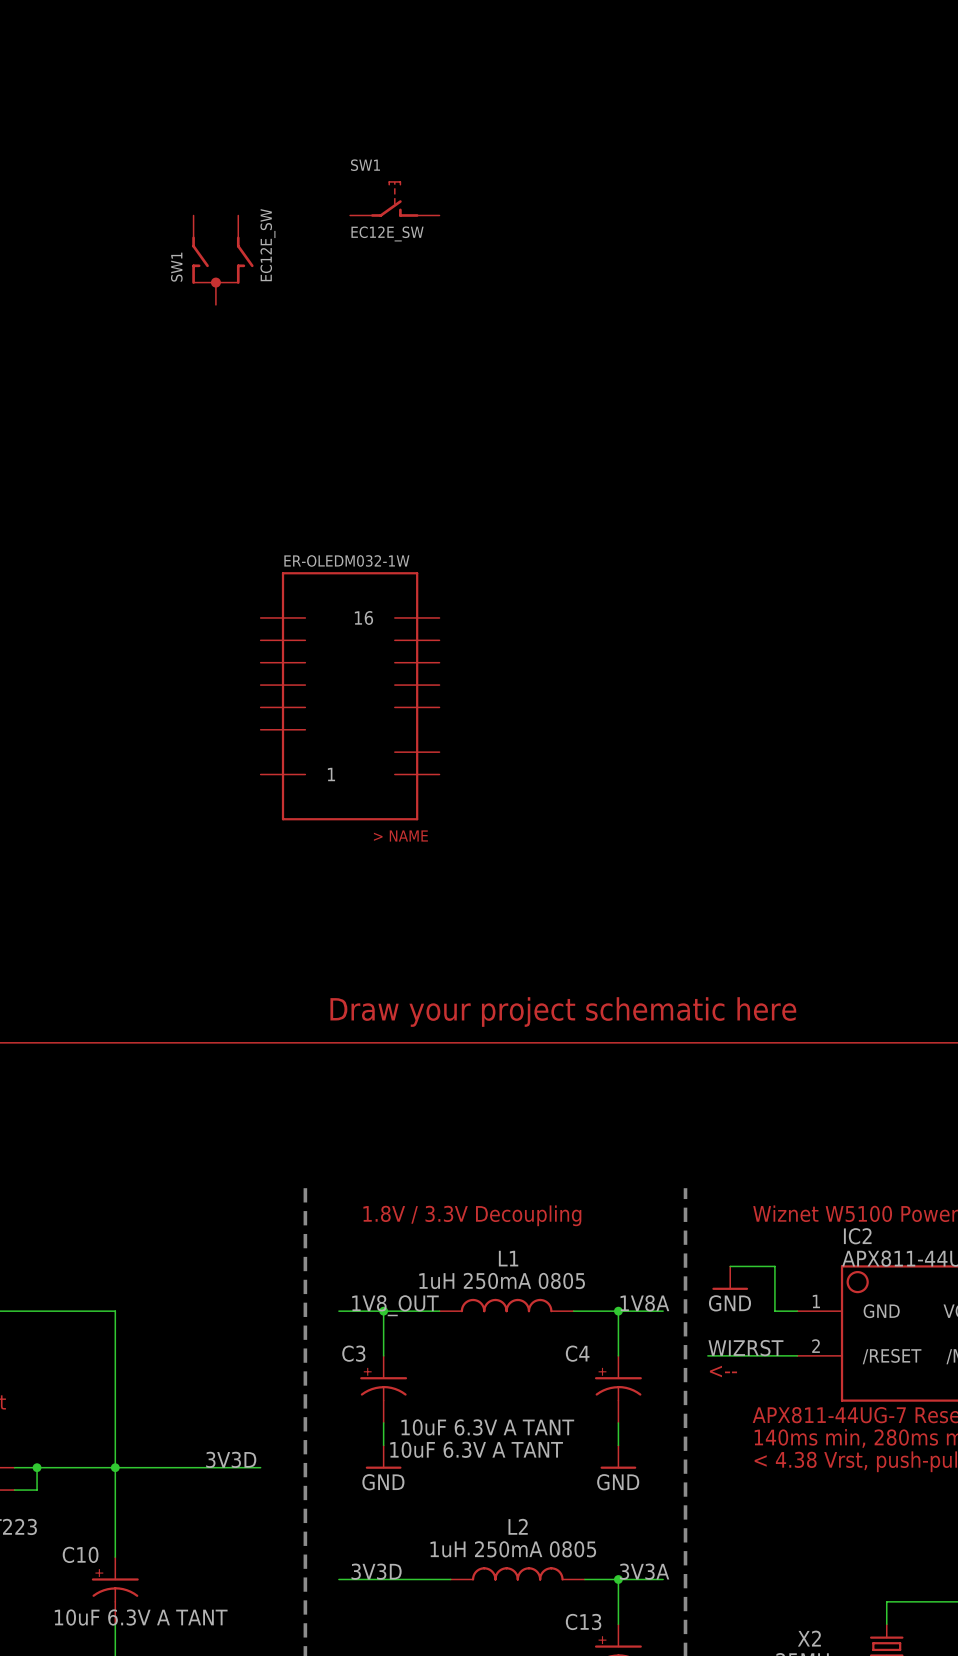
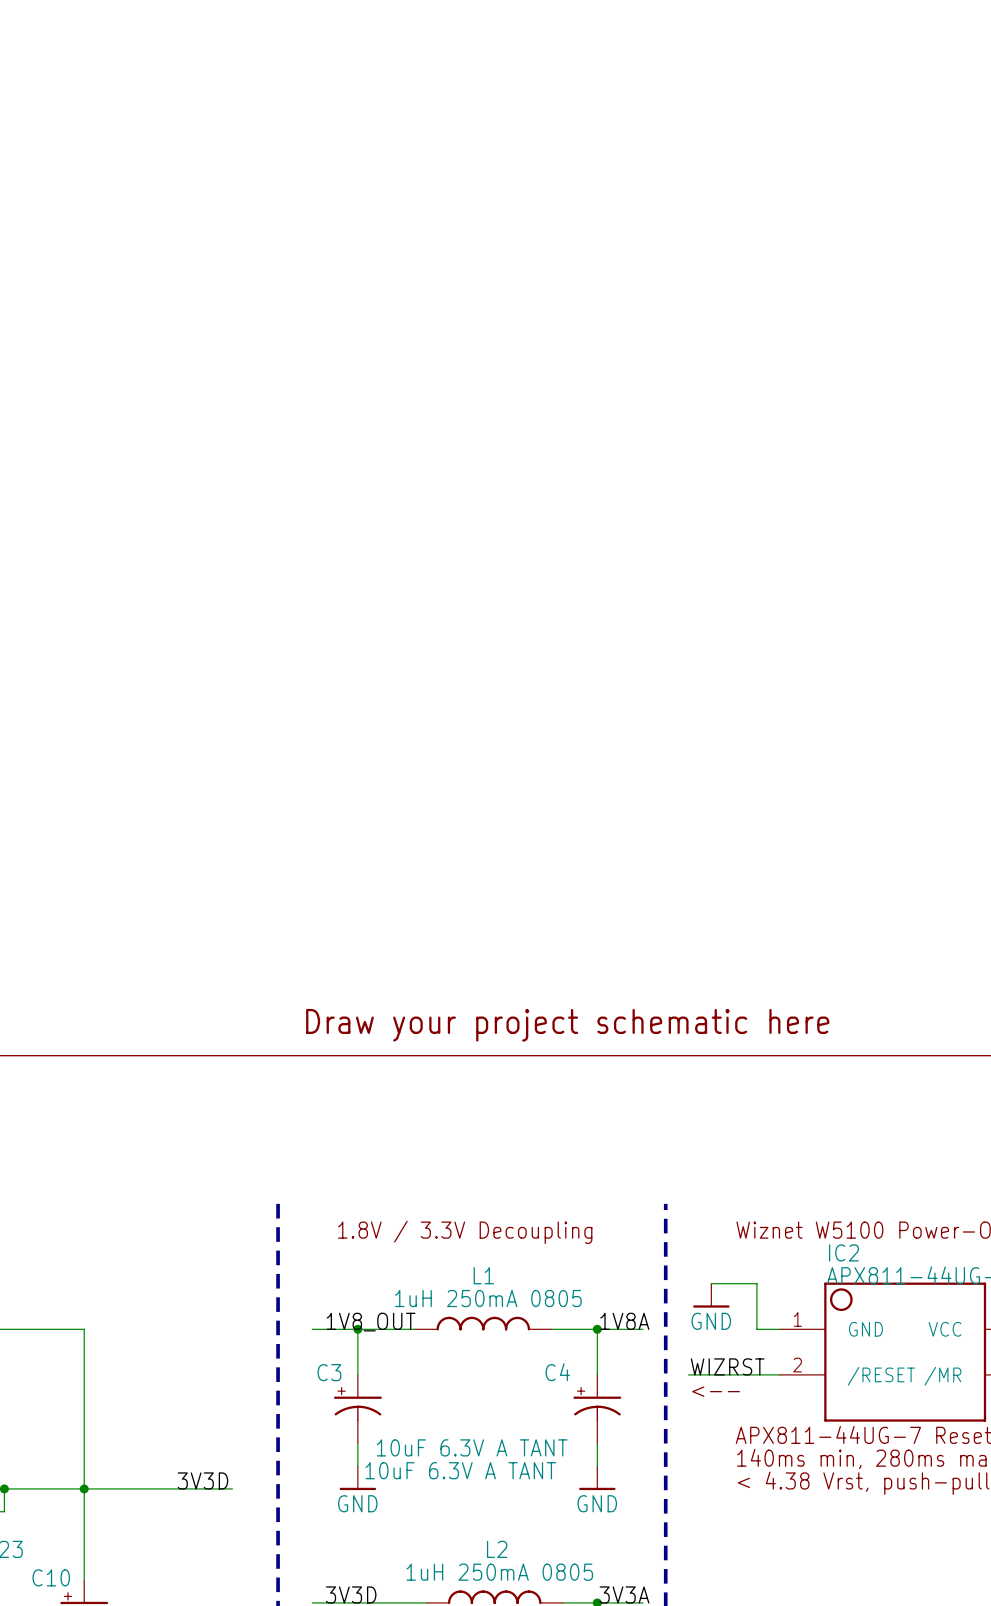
SW1: EC12E_SW (394, 199) -> none
SW1: EC12E_SW (222, 260) -> none
part: (350, 696) -> none

